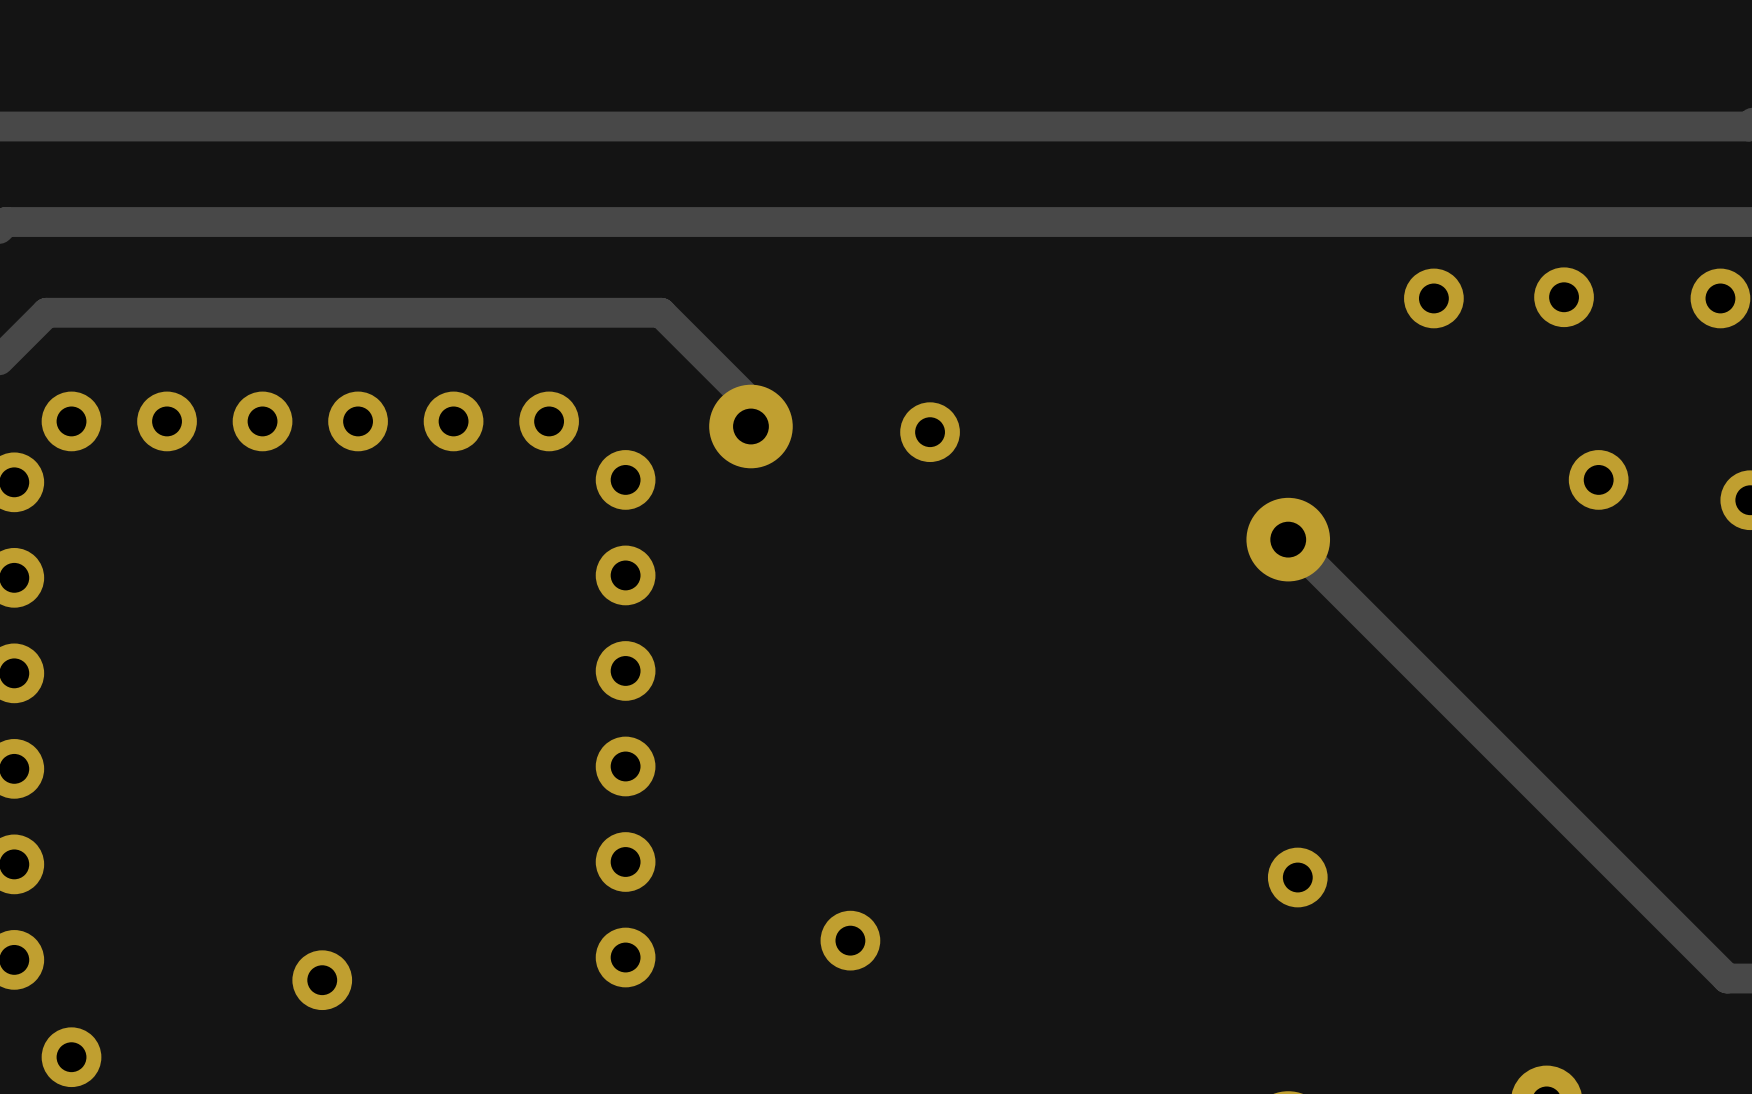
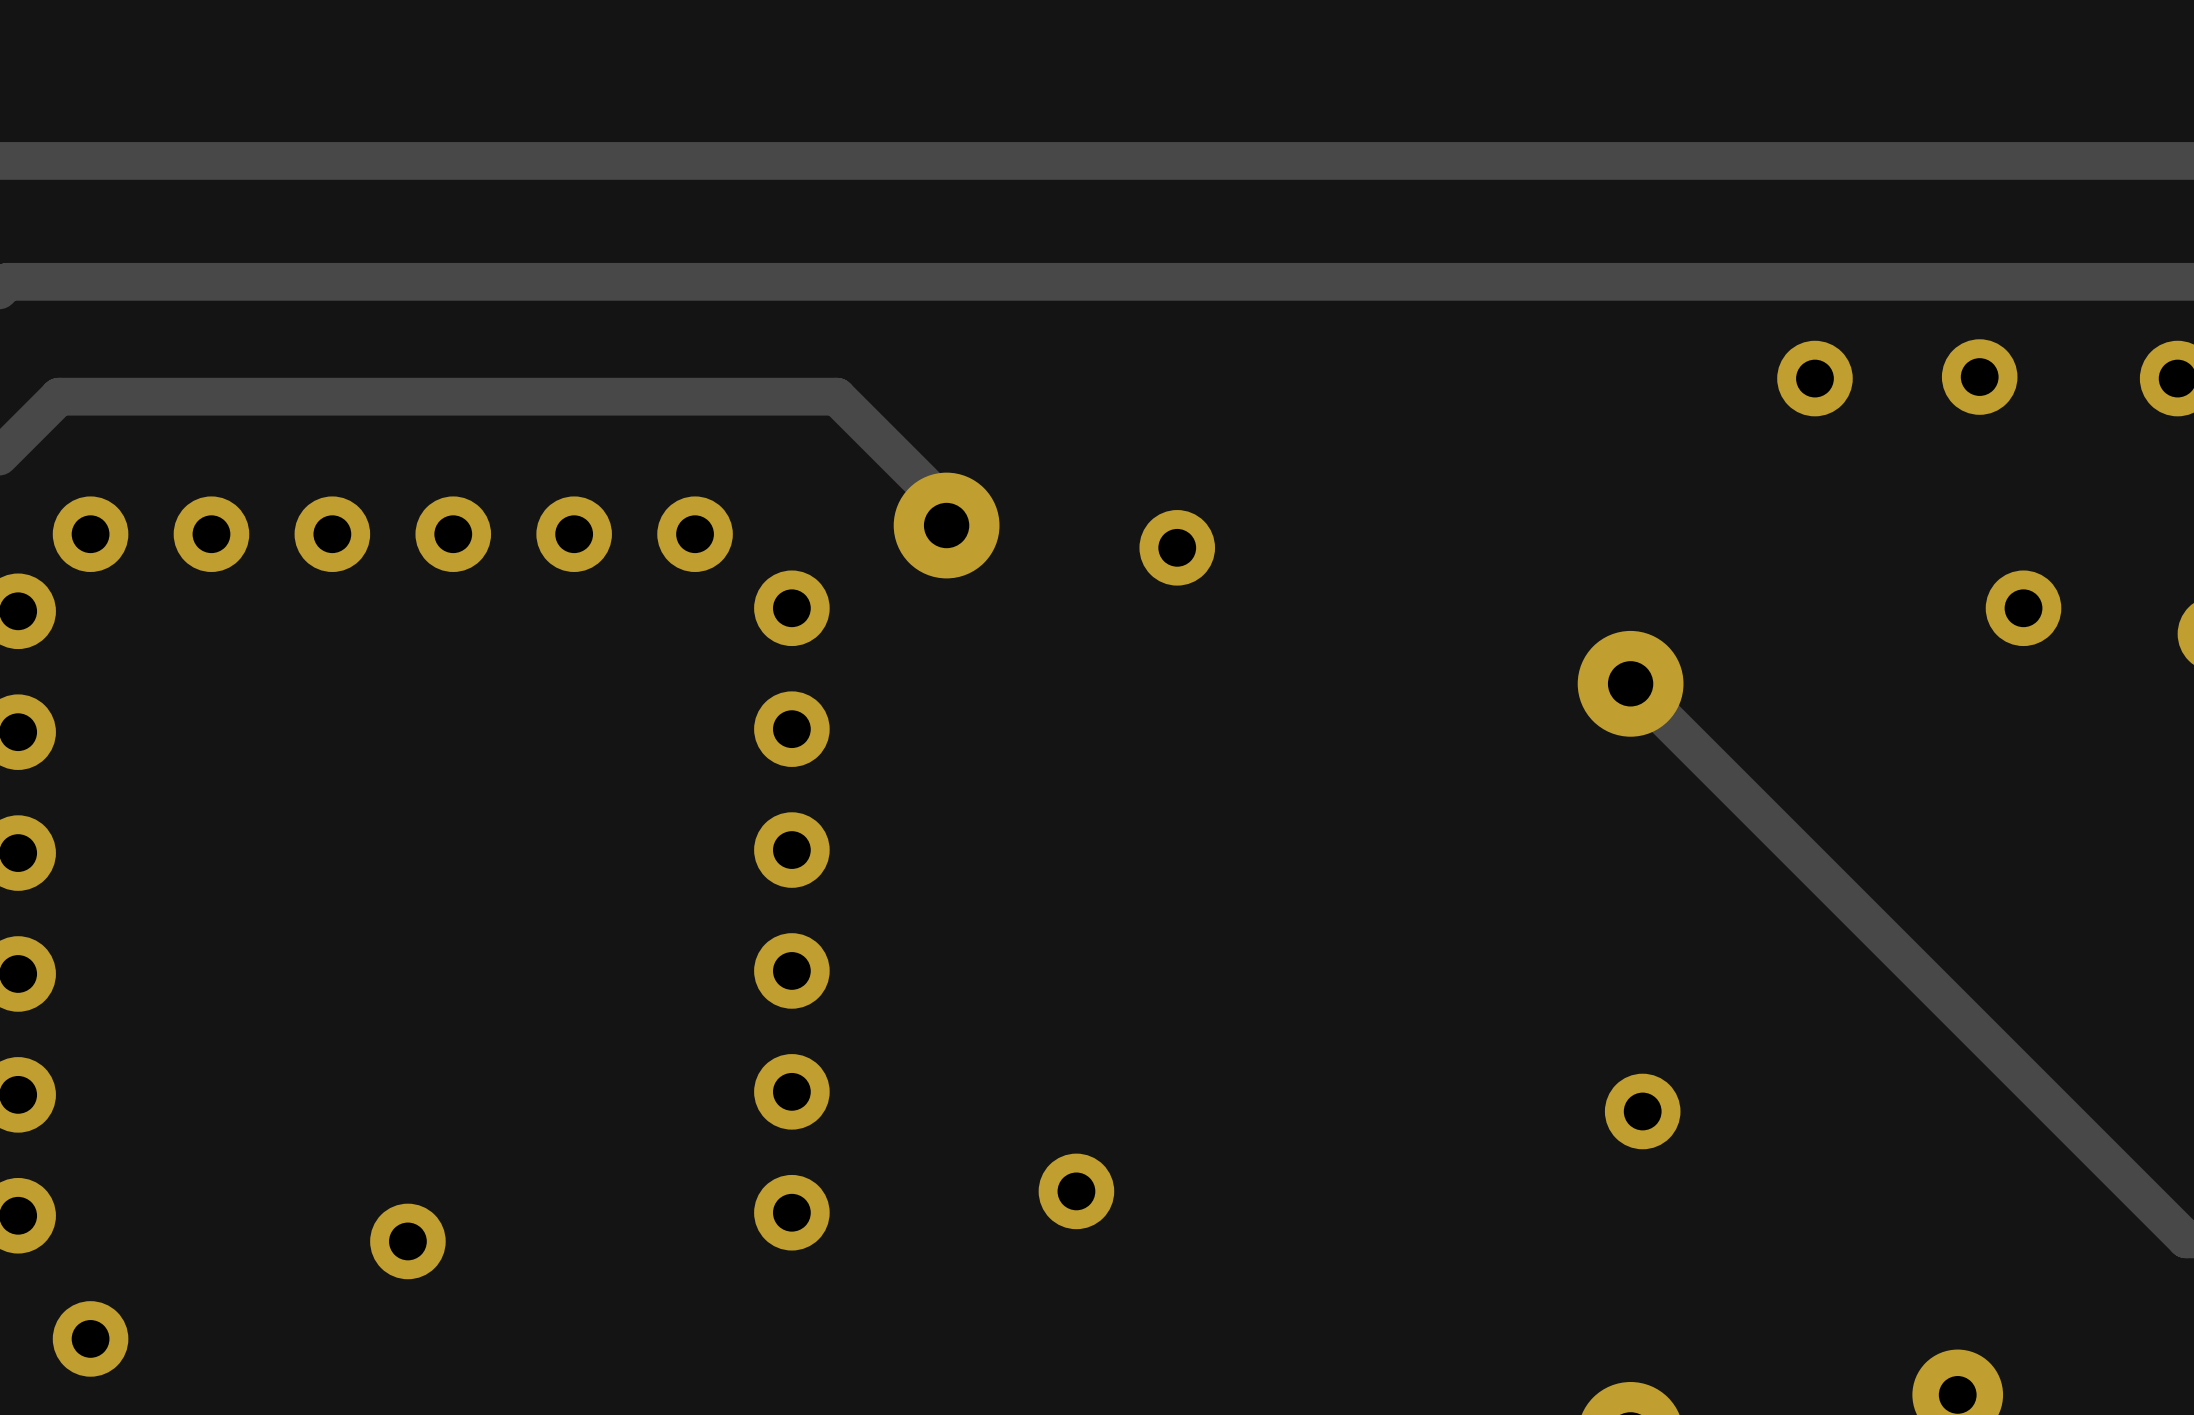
via position: (750, 426) -> (946, 525)

